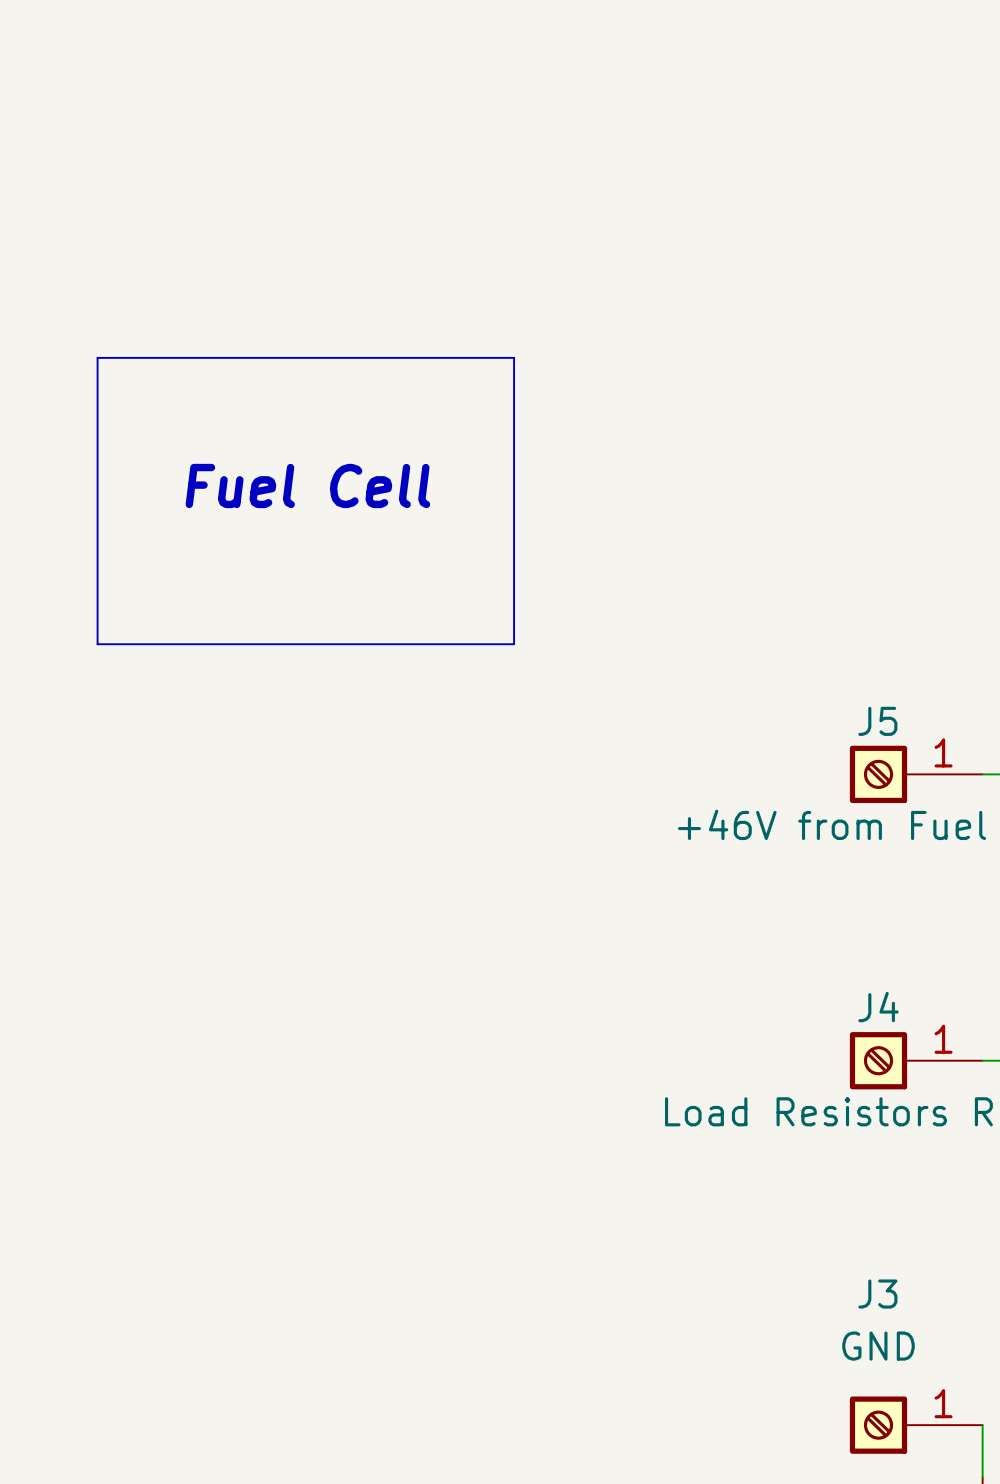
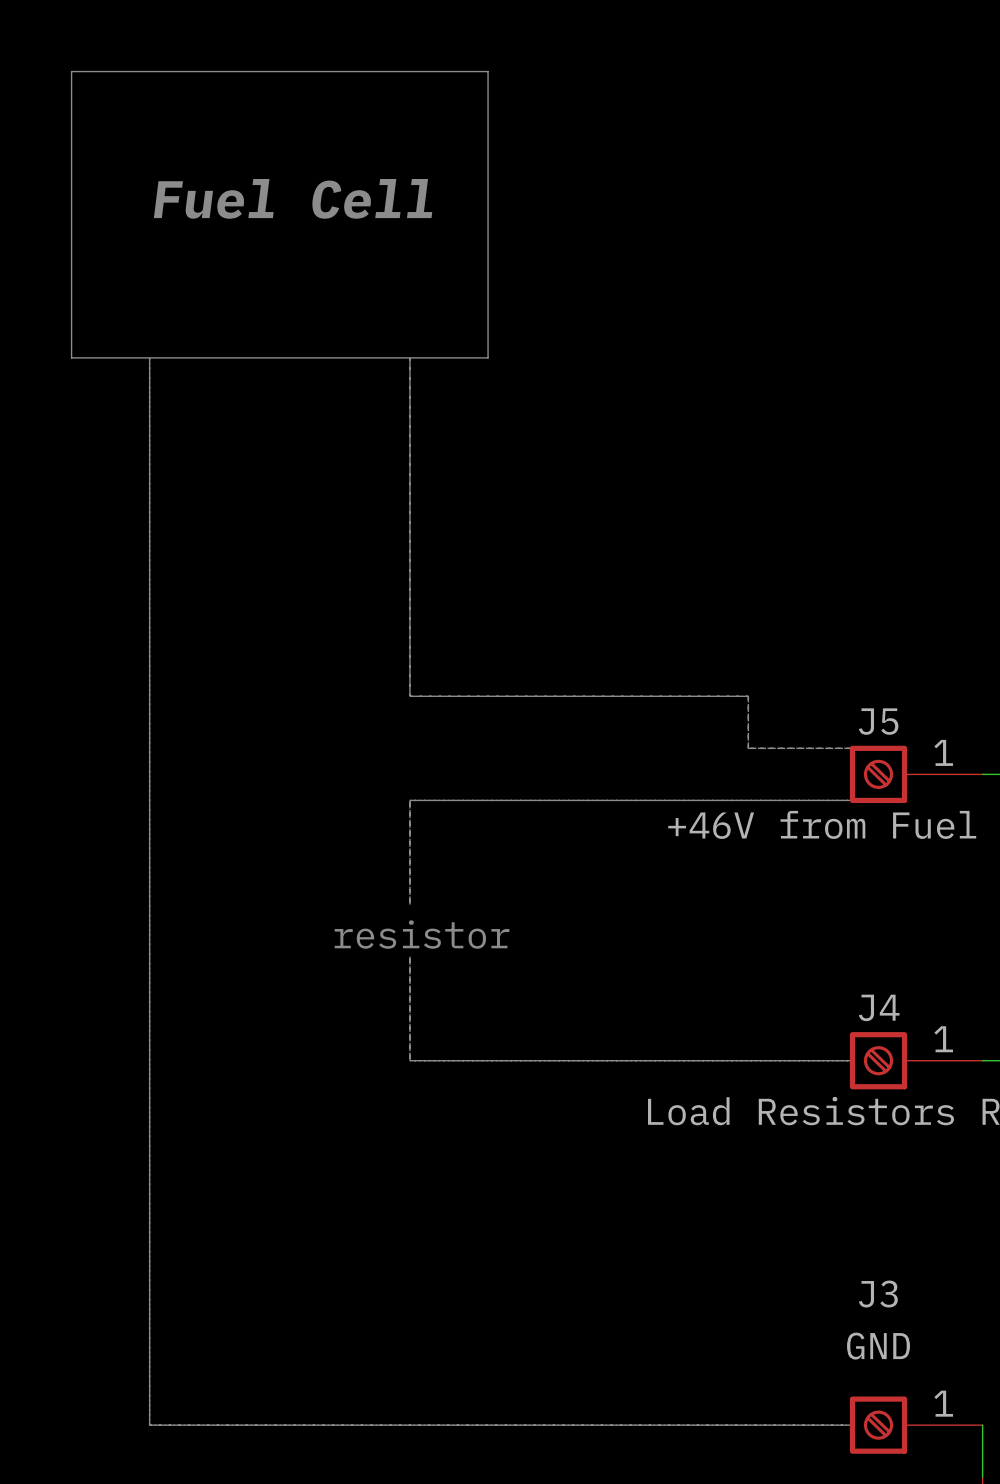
line: (97, 357) (97, 644) (514, 644) (514, 357) (488, 357) -> (97, 357) (71, 357) (71, 71) (488, 71) (488, 357)
line: none -> (149, 357) (149, 1425) (852, 1425)
line: none -> (409, 357) (409, 696) (748, 696) (748, 748) (852, 748)
text position: Fuel Cell (307, 485) -> Fuel Cell (293, 198)
line: none -> (852, 800) (409, 800) (409, 904)
text: none -> resistor (422, 934)
line: none -> (409, 956) (409, 1060) (852, 1060)

